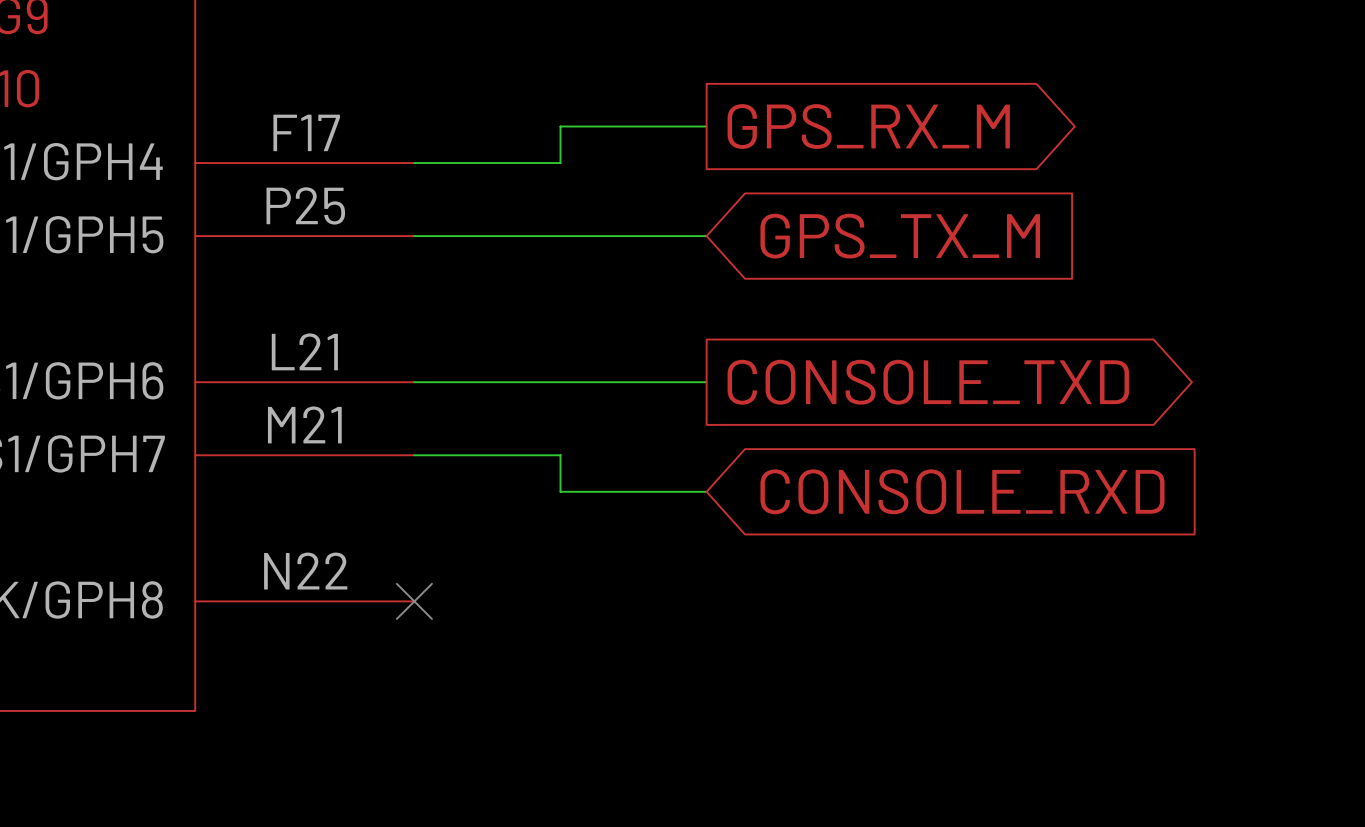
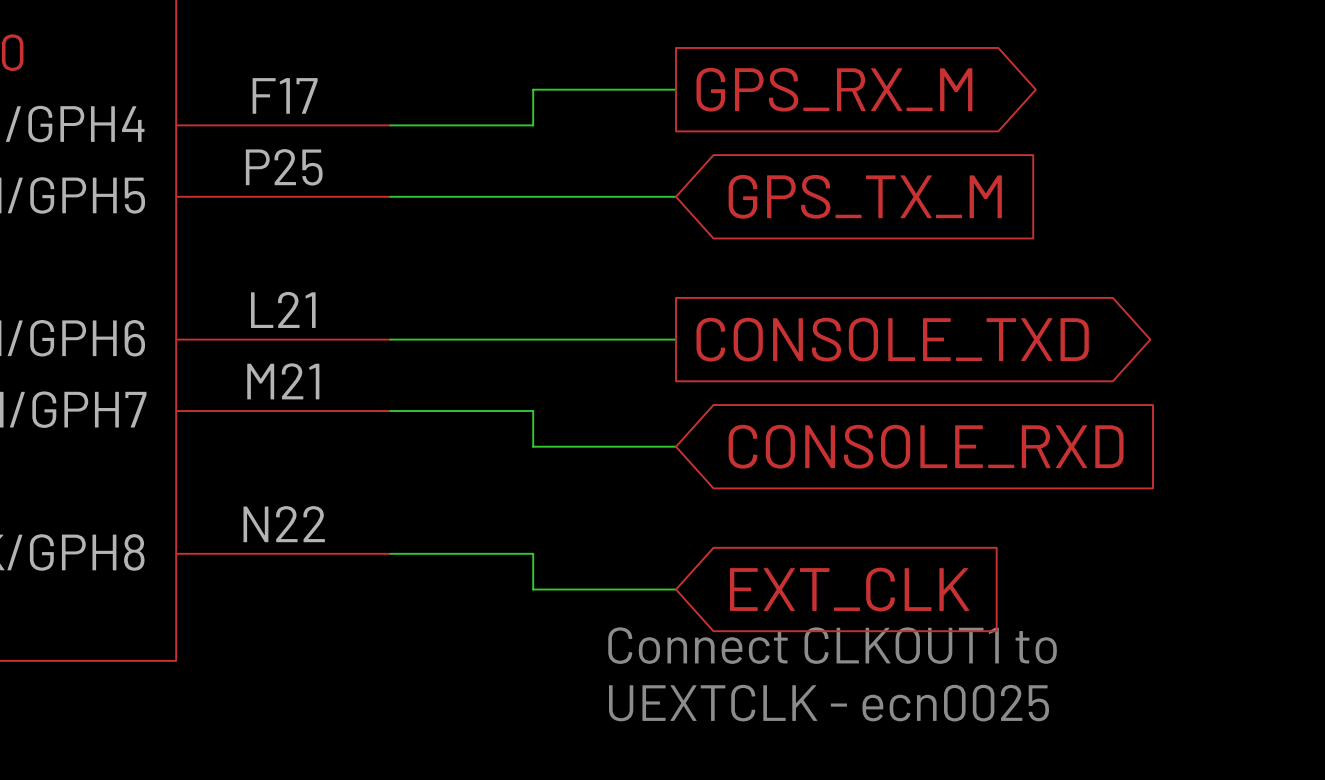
wire: none -> (390, 553) (533, 553) (533, 589) (676, 589)
no-connect mark: (414, 601) -> none
global label: none -> EXT_CLK (849, 589)
text: none -> Connect CLKOUT1 to (832, 645)
text: none -> UEXTCLK - ecn0025 (829, 703)

